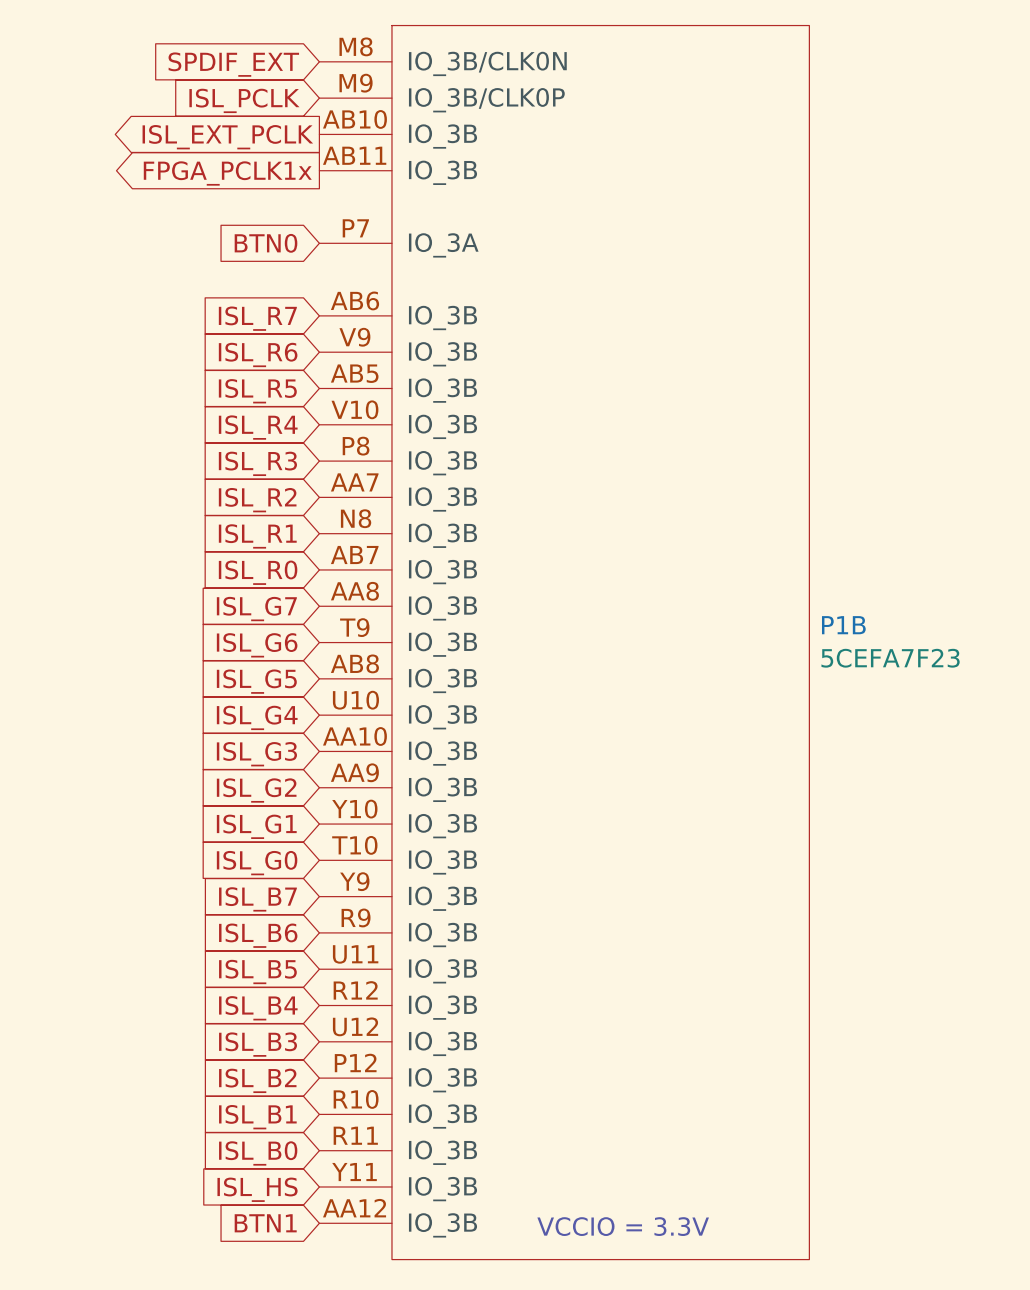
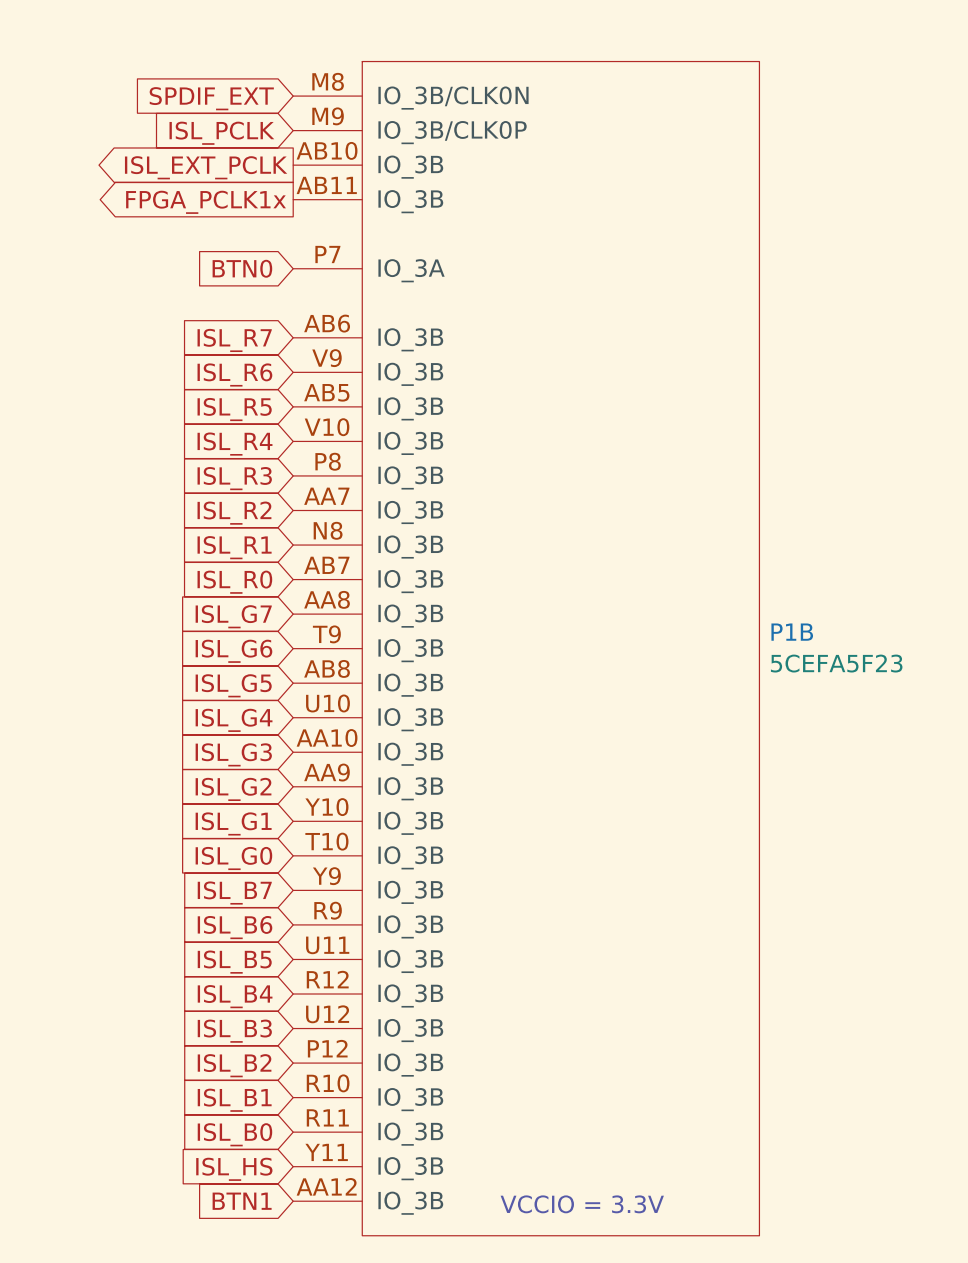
P1B value: 5CEFA7F23 (890, 658) -> 5CEFA5F23 (836, 663)

